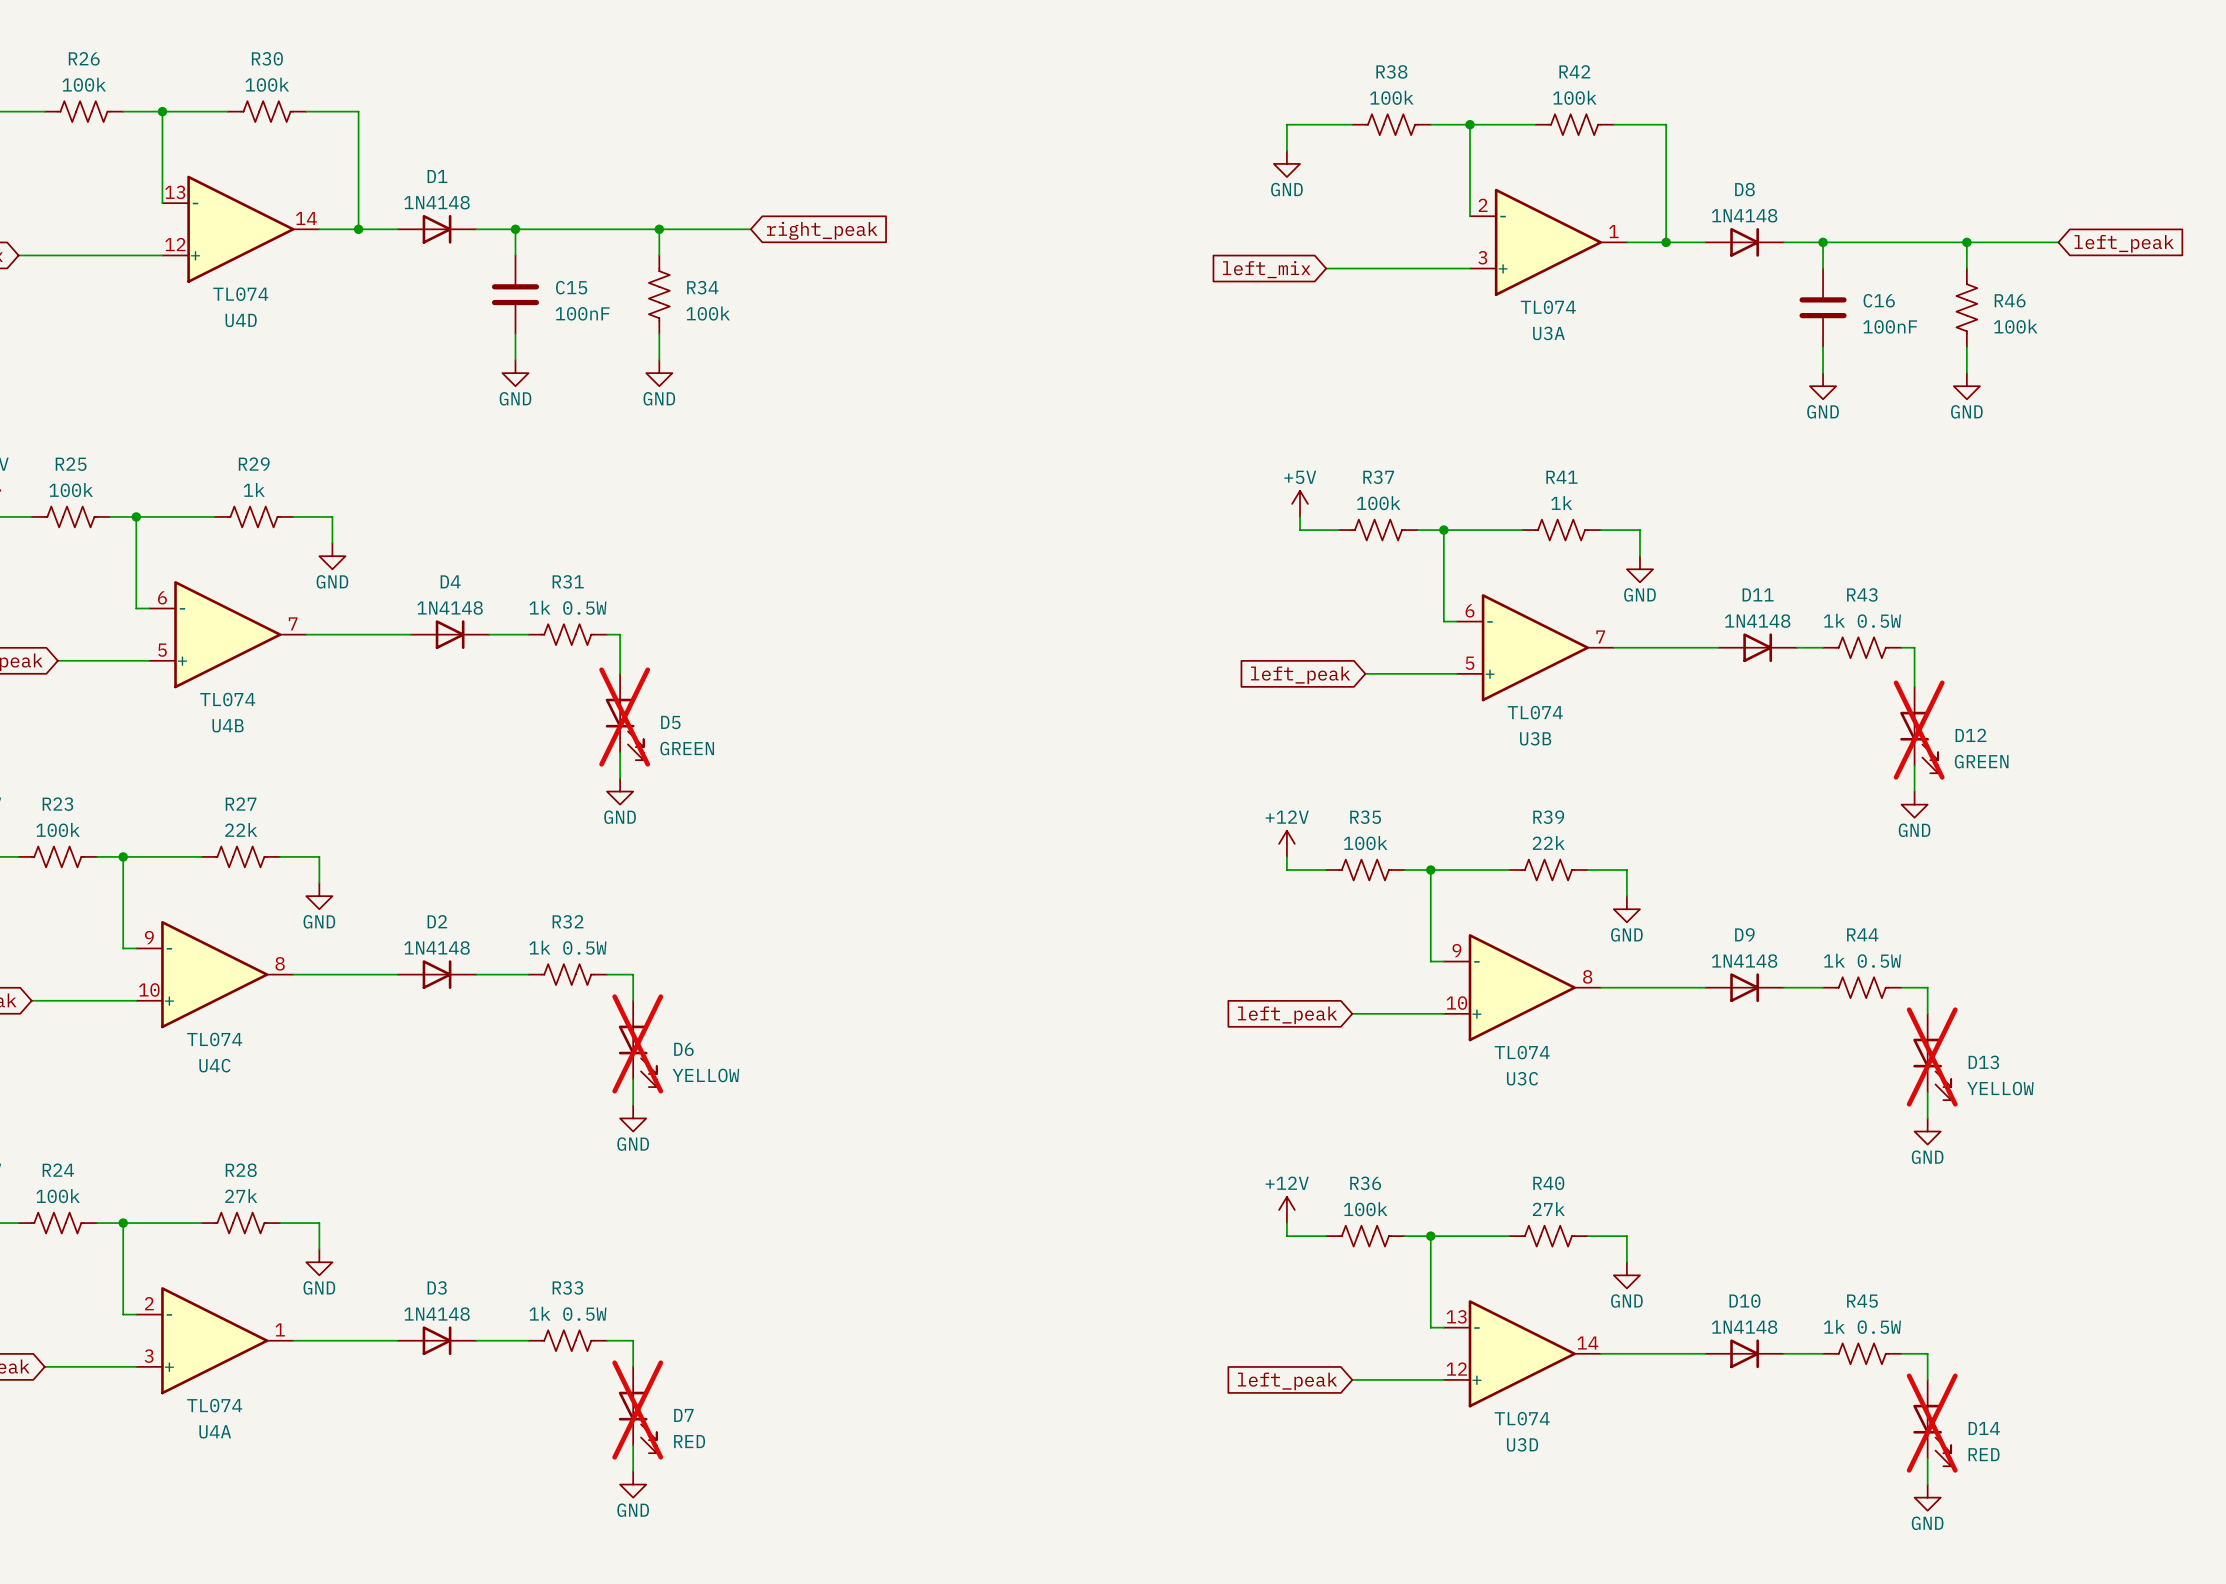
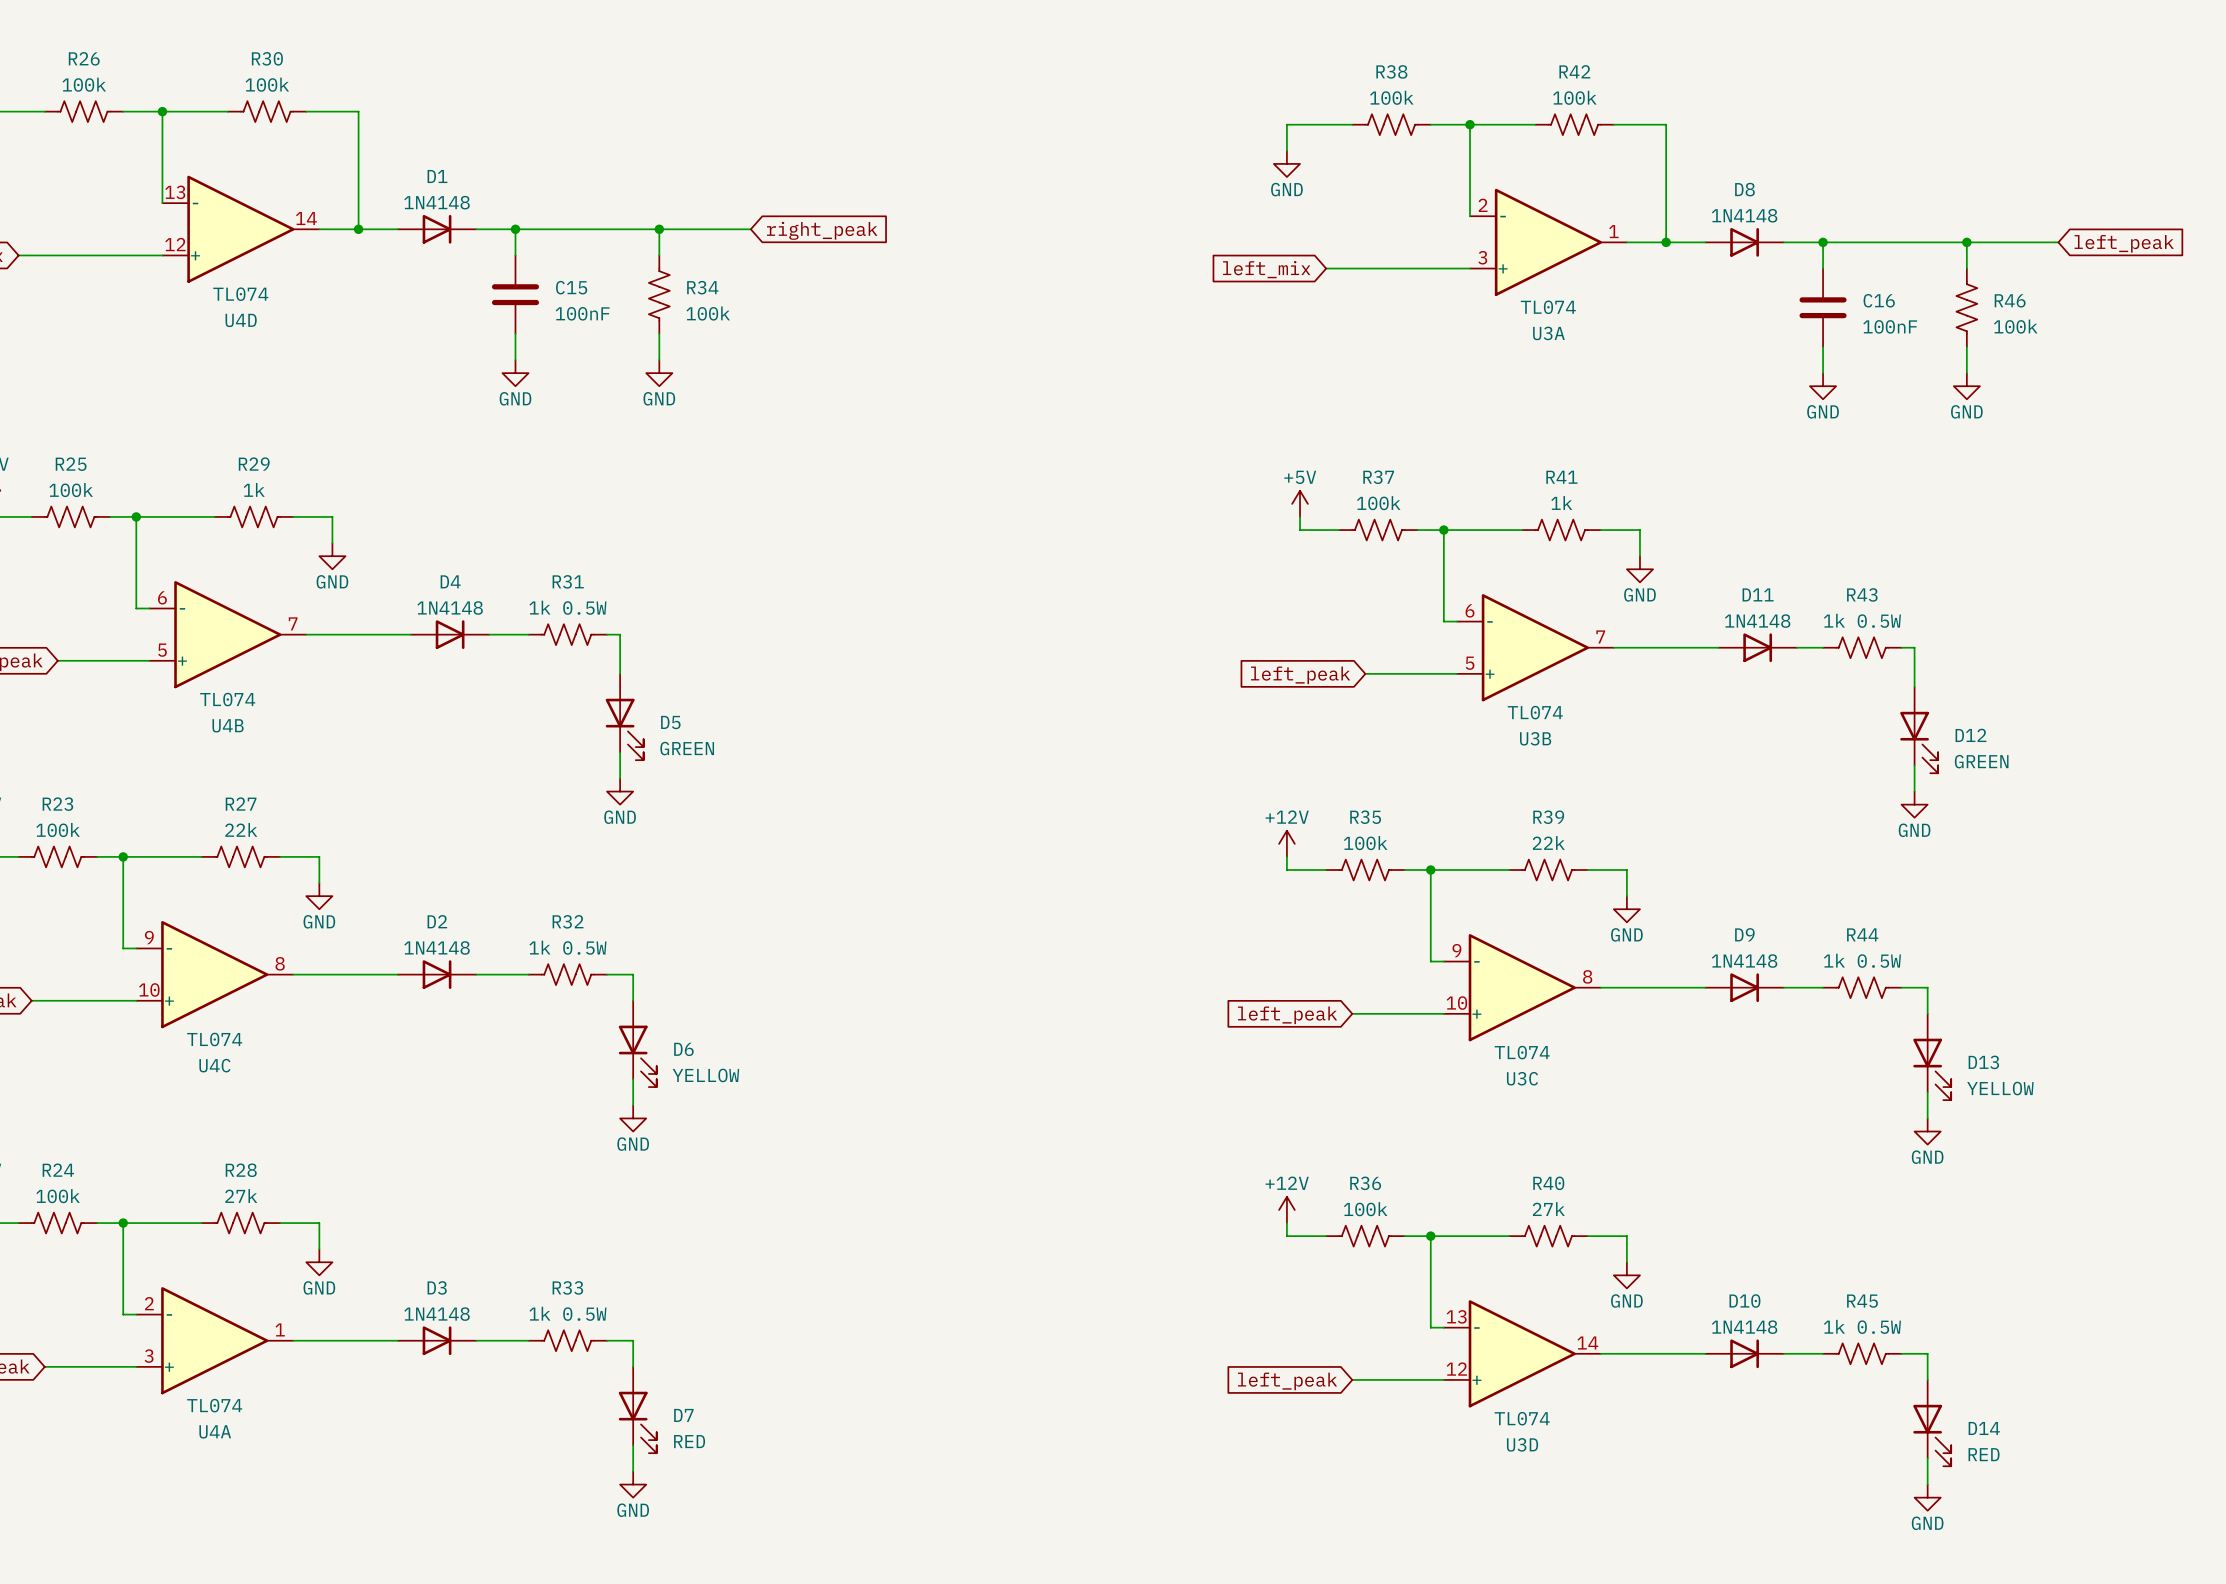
D5 do-not-place cross: (624, 717) -> none
D12 do-not-place cross: (1919, 730) -> none
D6 do-not-place cross: (637, 1043) -> none
D13 do-not-place cross: (1932, 1056) -> none
D7 do-not-place cross: (637, 1410) -> none
D14 do-not-place cross: (1932, 1423) -> none

